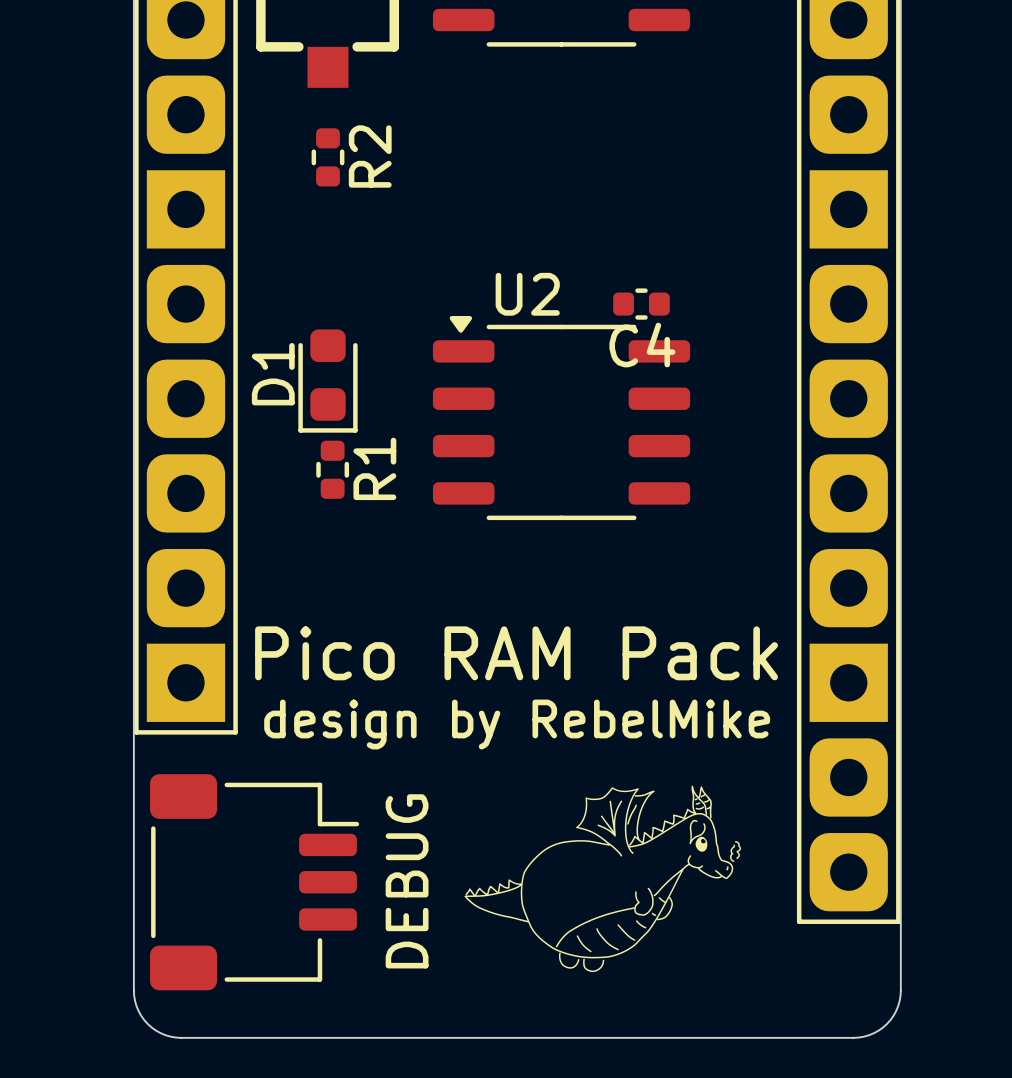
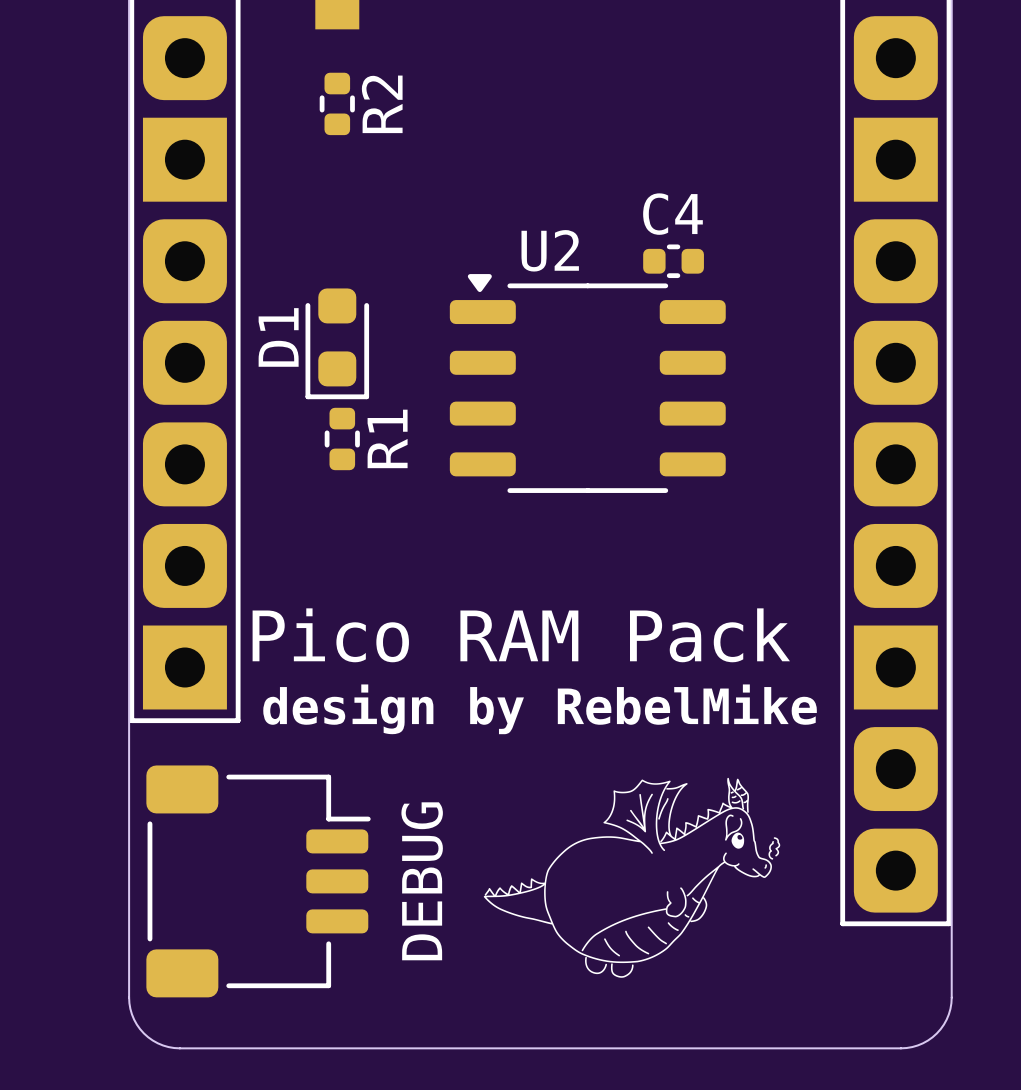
C4 name position: C4 (642, 345) -> C4 (672, 214)

